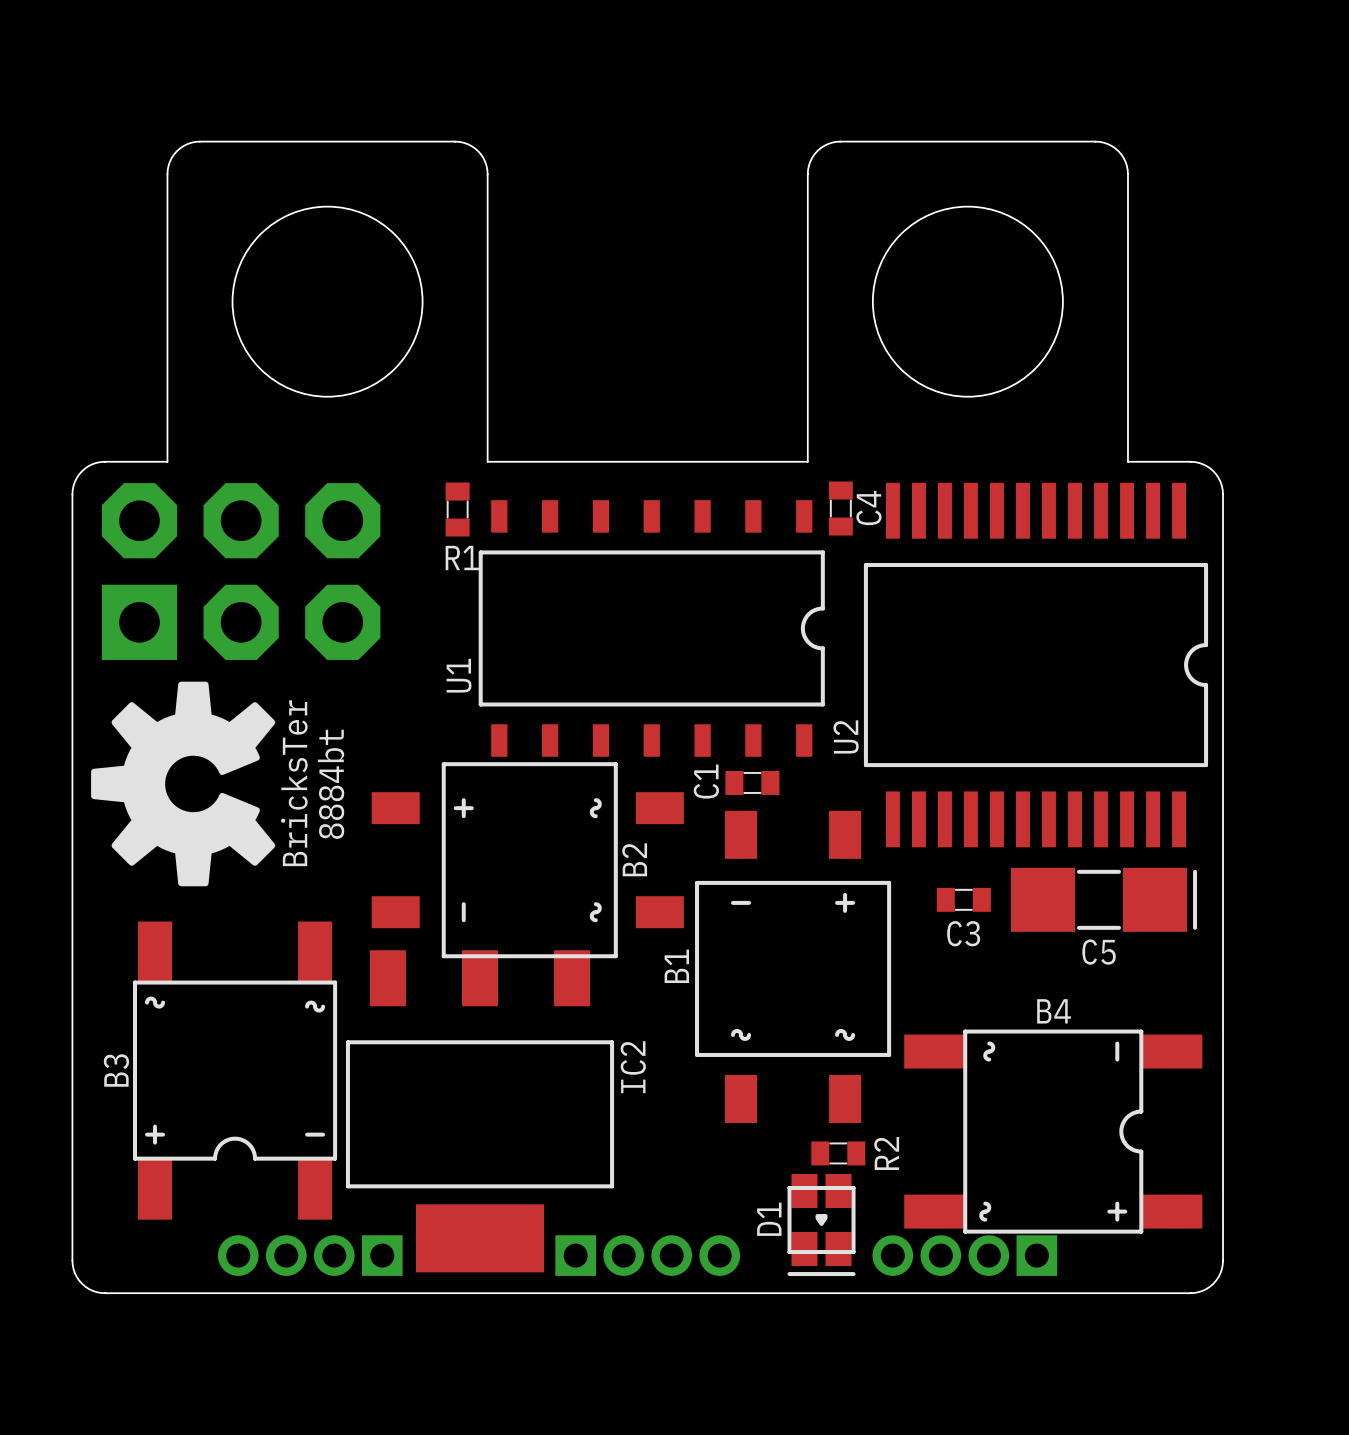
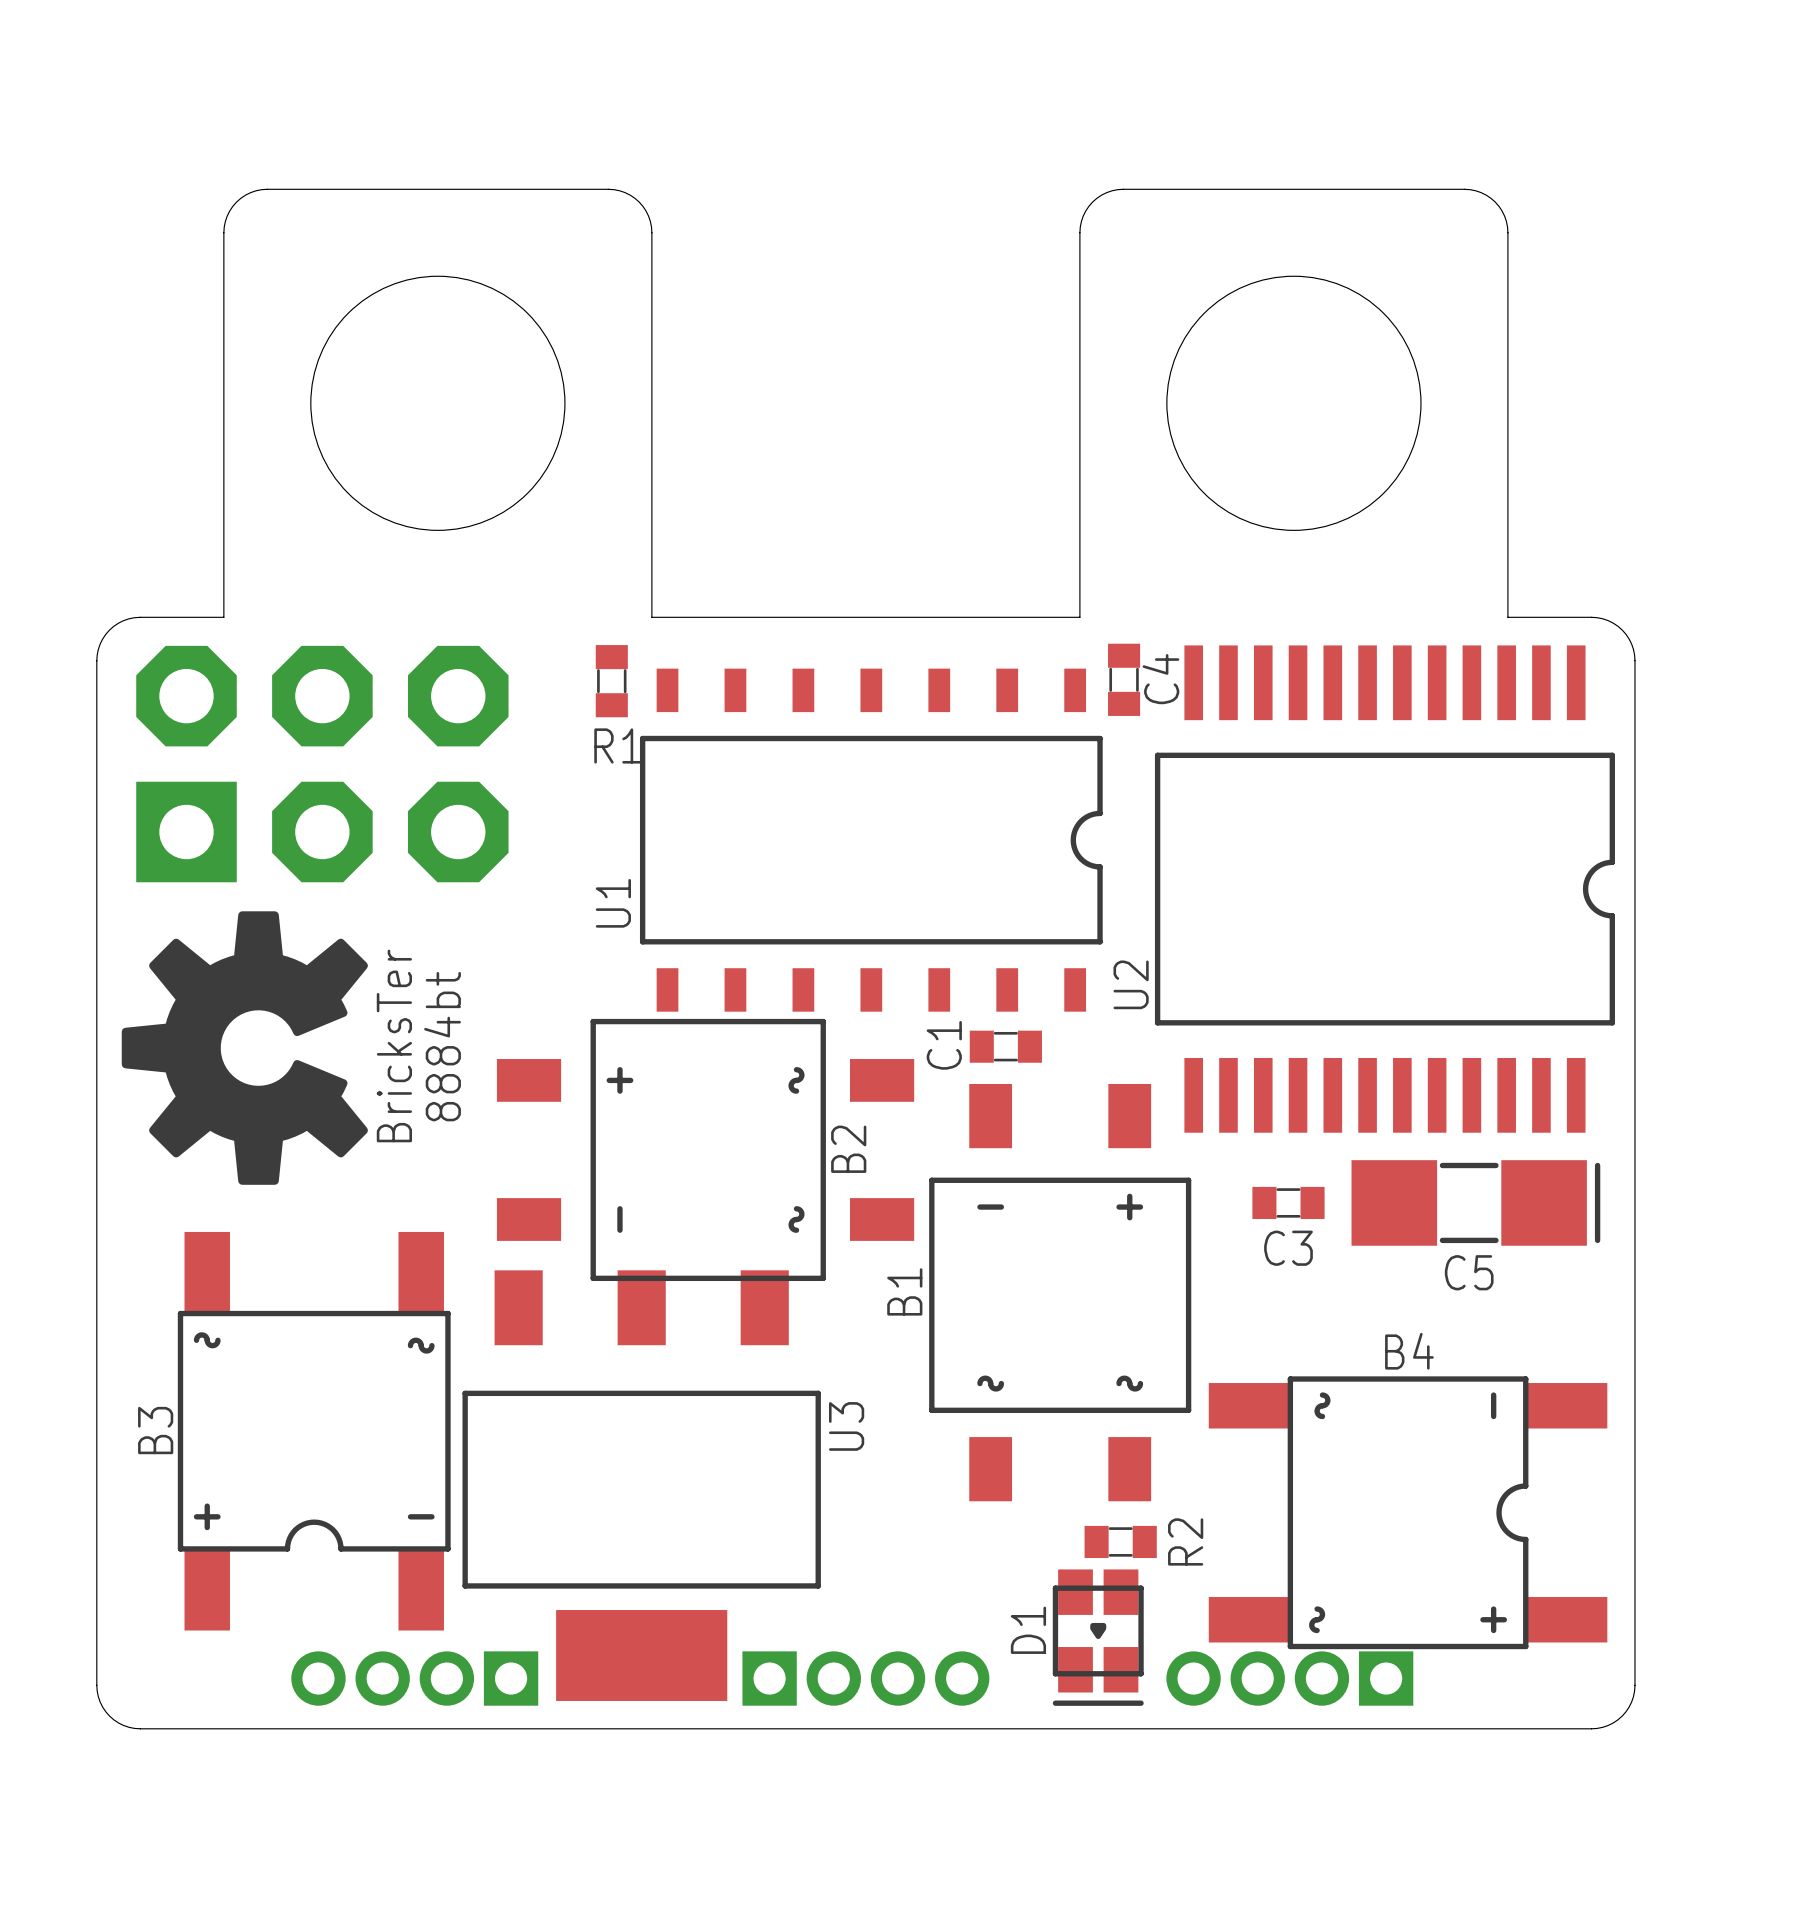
IC2 name: IC2 (633, 1067) -> U3 (846, 1426)

